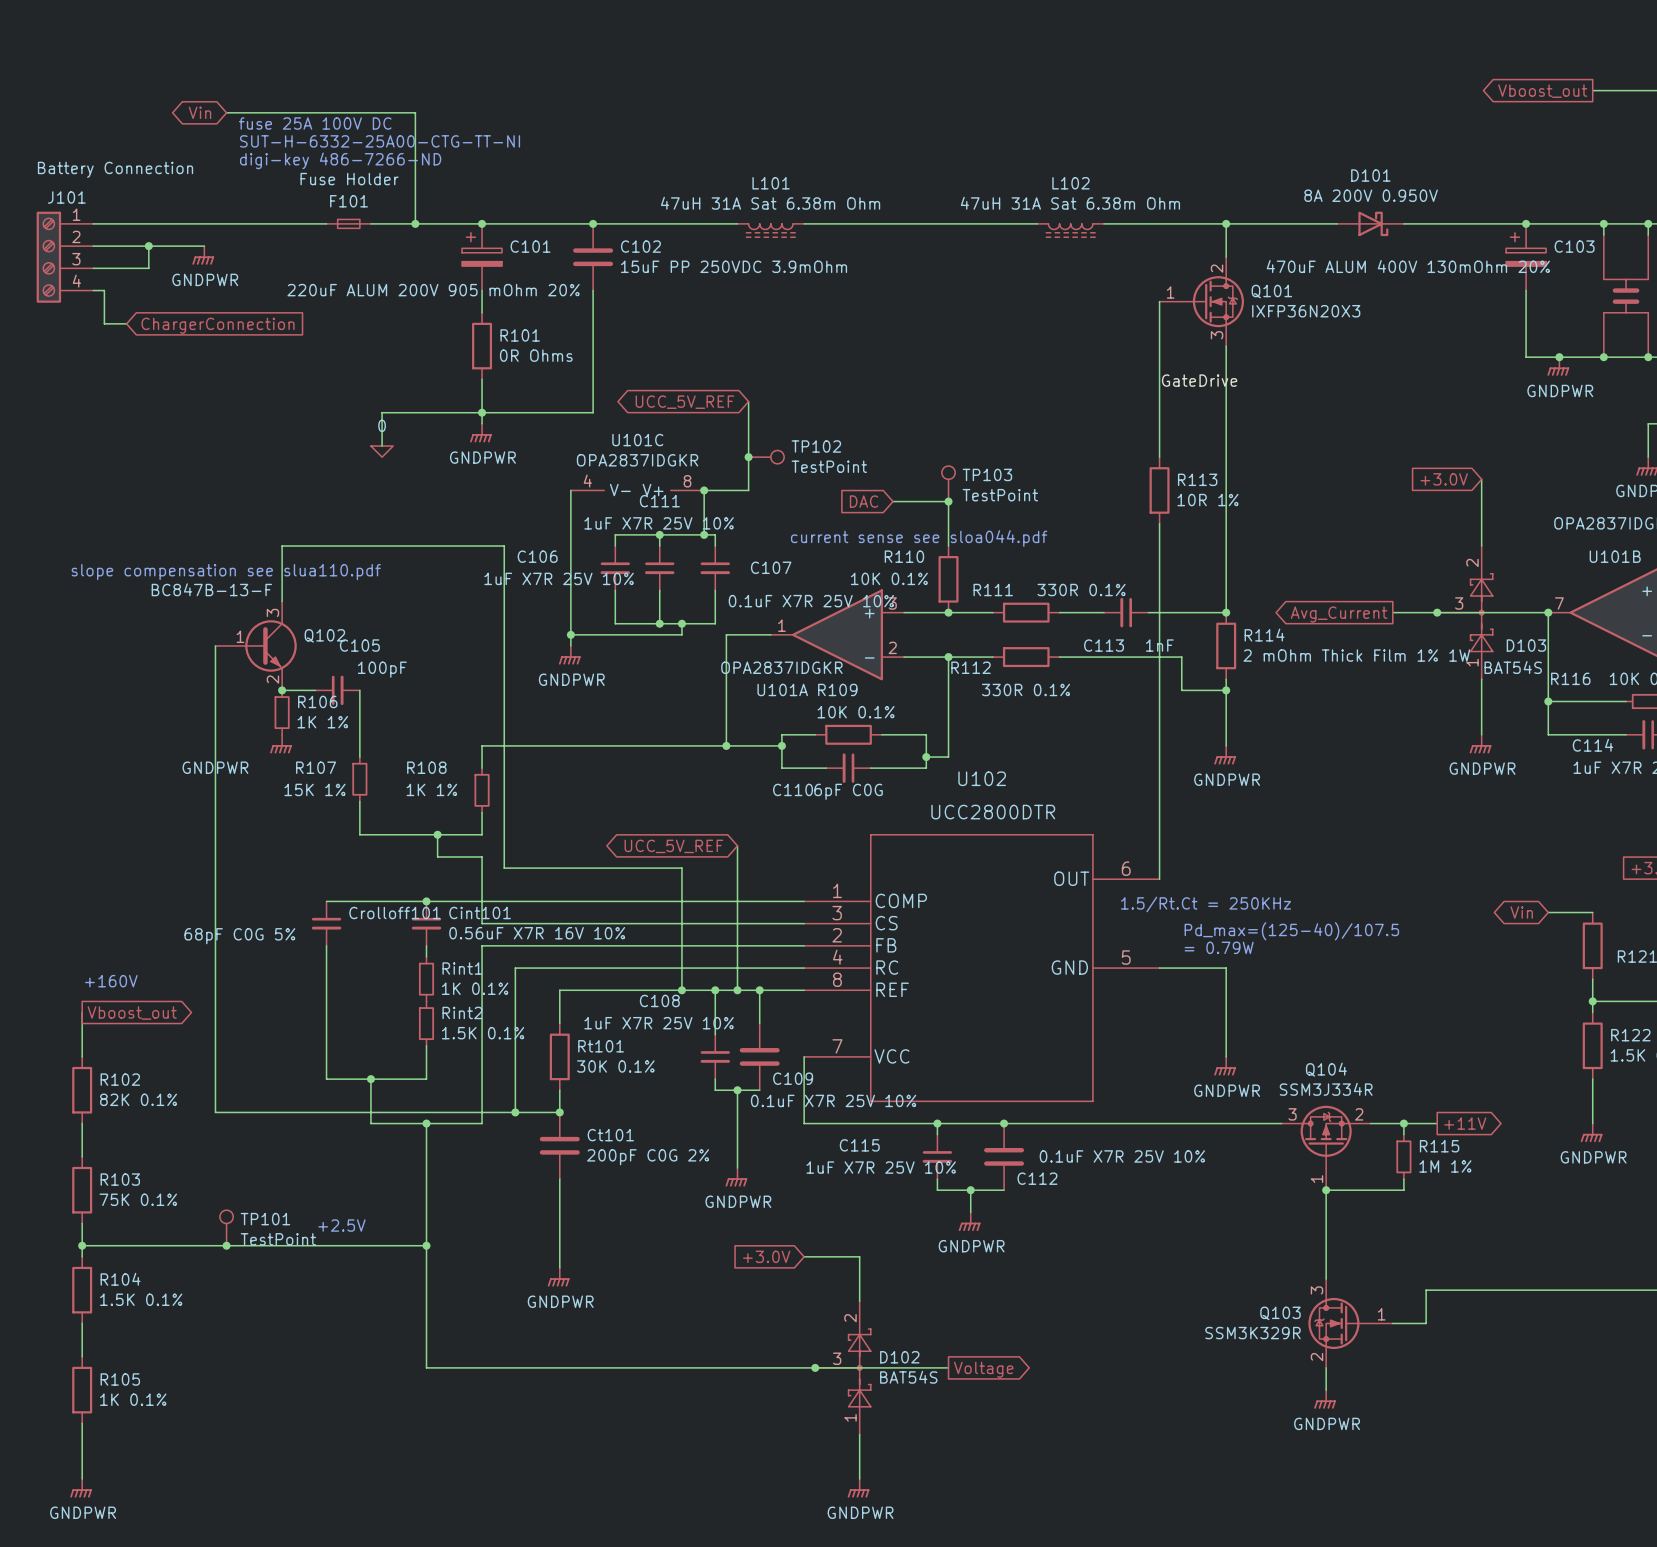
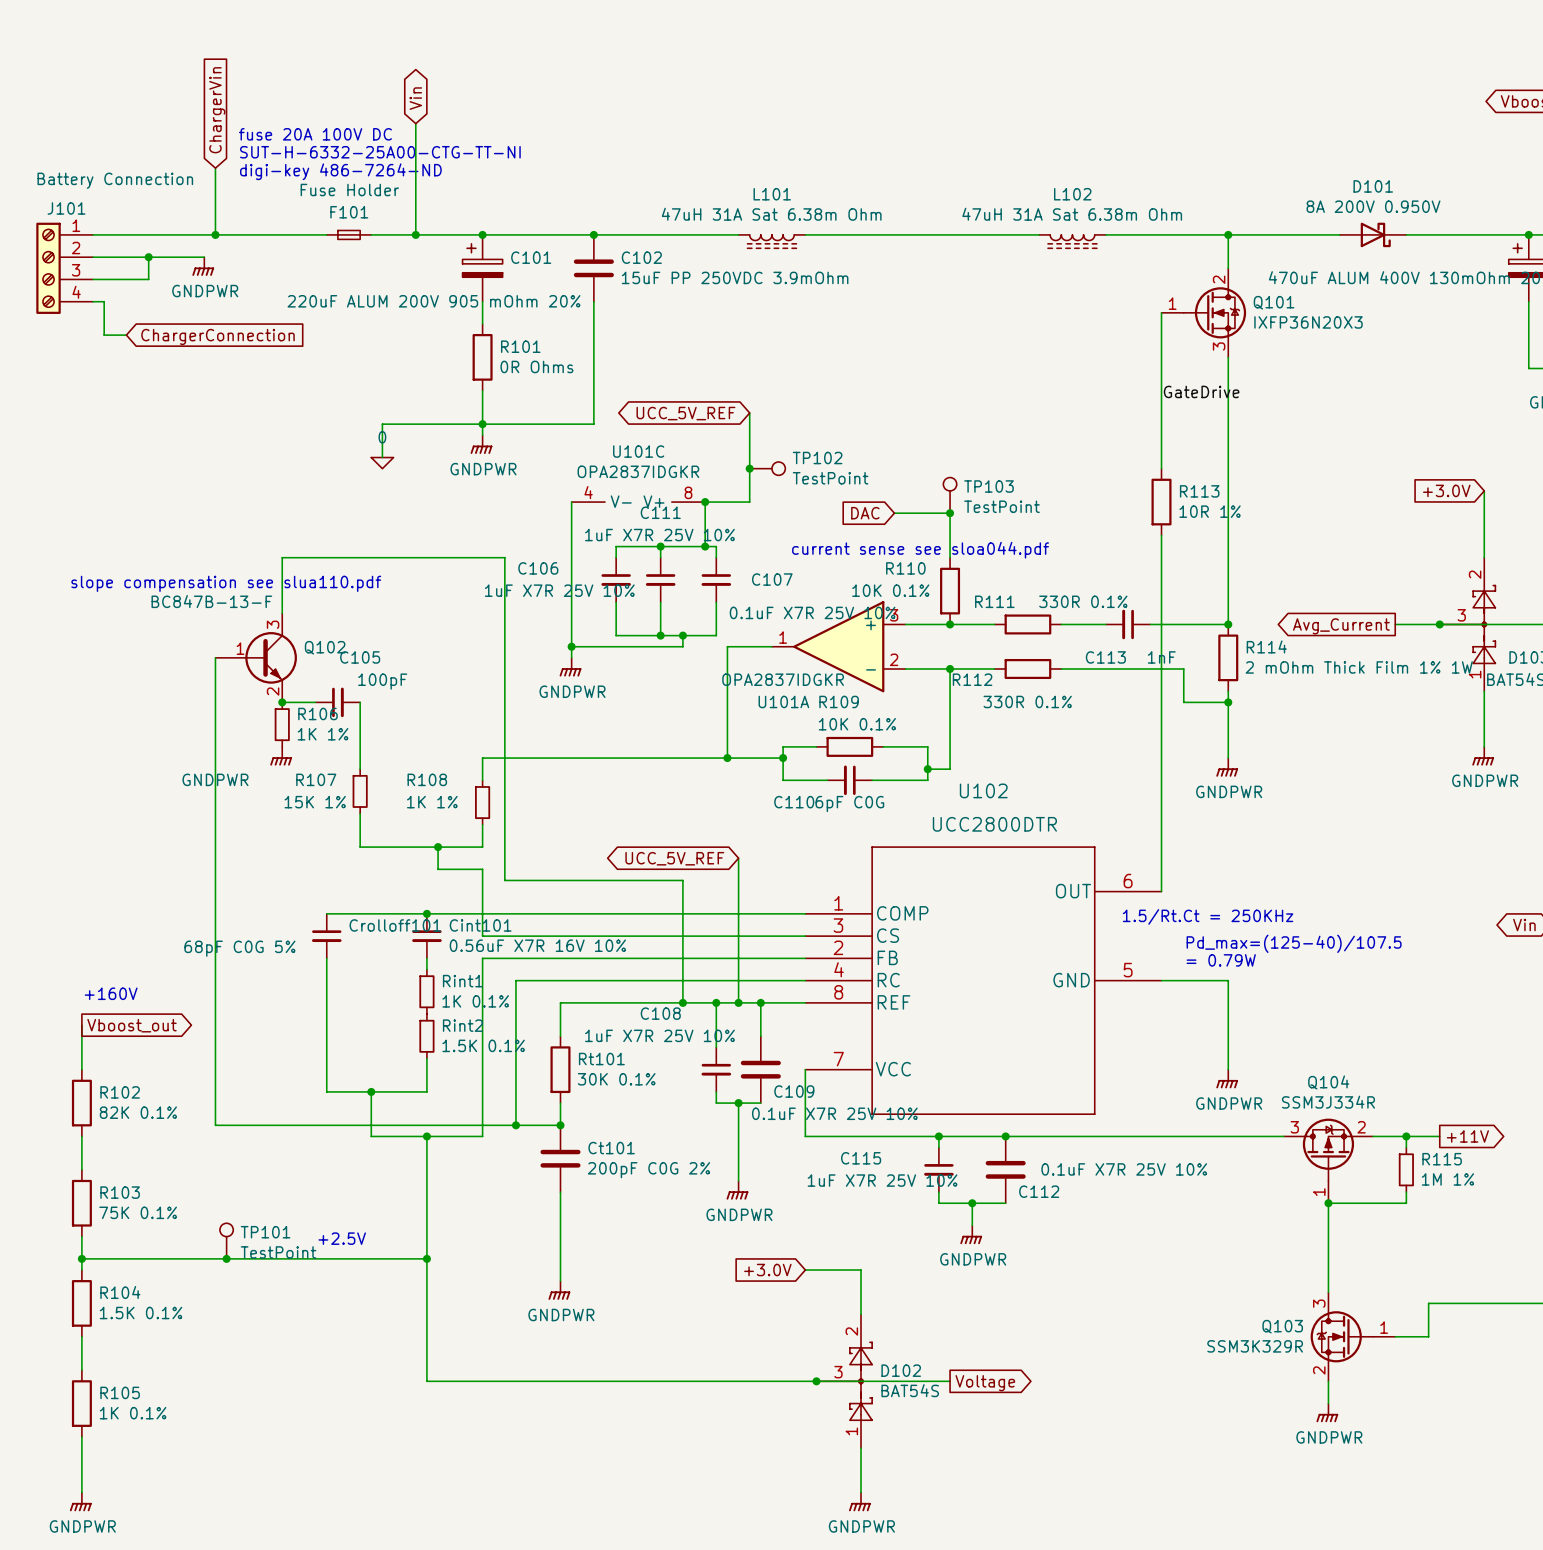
global label: none -> ChargerVin (217, 110)
global label rotation: 0° (199, 112) -> 90° clockwise (415, 98)
global label position: Vin (199, 112) -> Vin (415, 98)
wire: (226, 112) (415, 112) -> none
text: fuse 25A 100V DC (315, 123) -> fuse 20A 100V DC (315, 134)
wire: none -> (215, 168) (215, 234)
text: digi-key 486-7266-ND (340, 160) -> digi-key 486-7264-ND (340, 171)
junction: none -> (215, 234)

